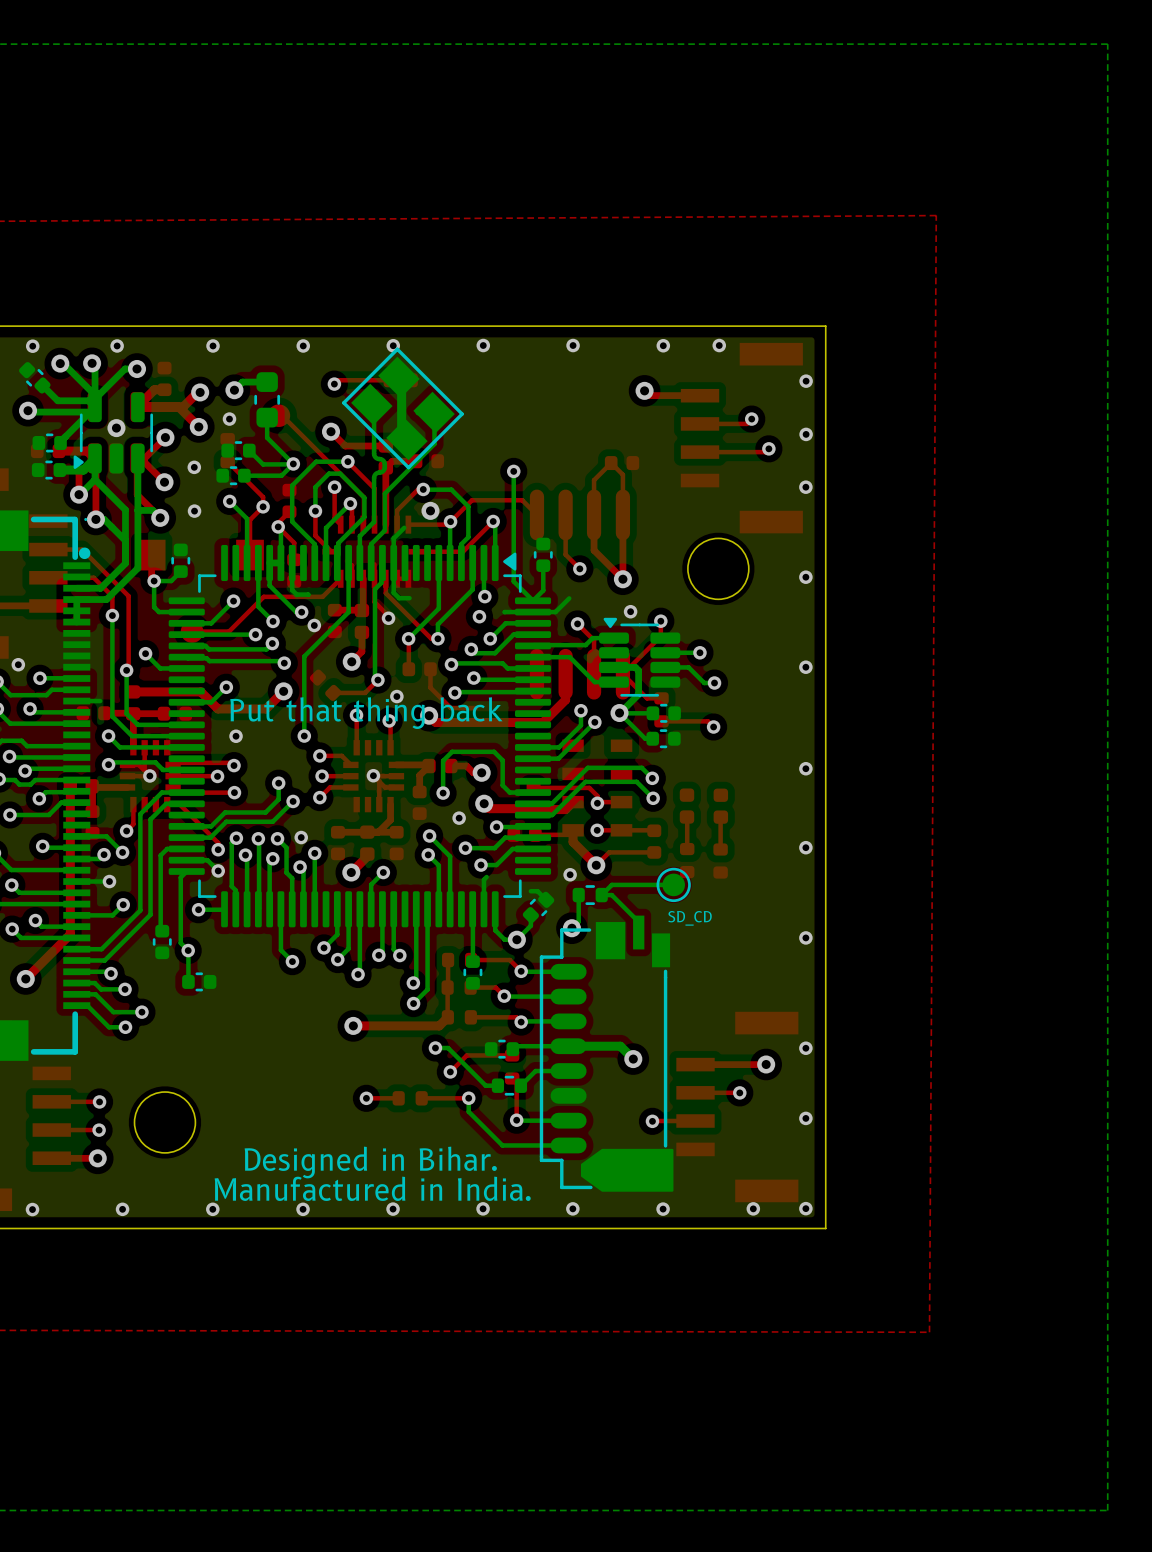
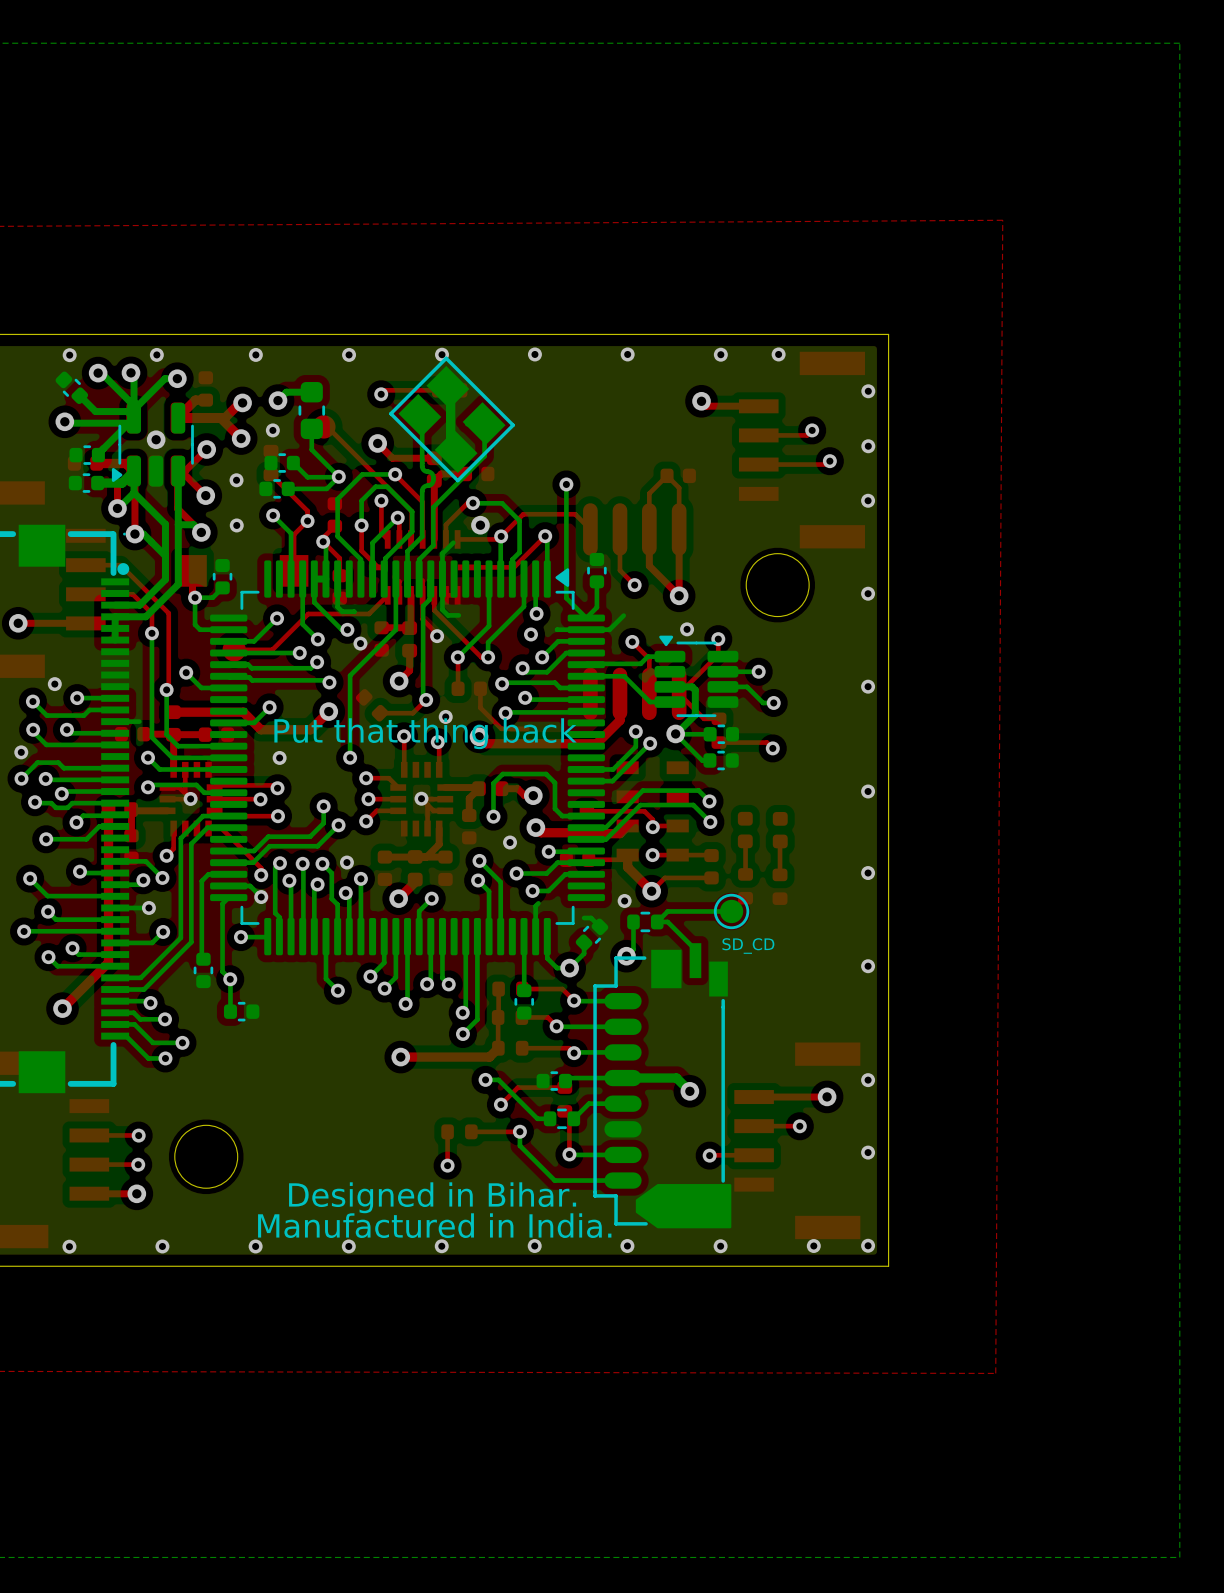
via position: (366, 1098) -> (447, 1165)
top track: (398, 1098) (366, 1098) -> (447, 1131) (447, 1165)

